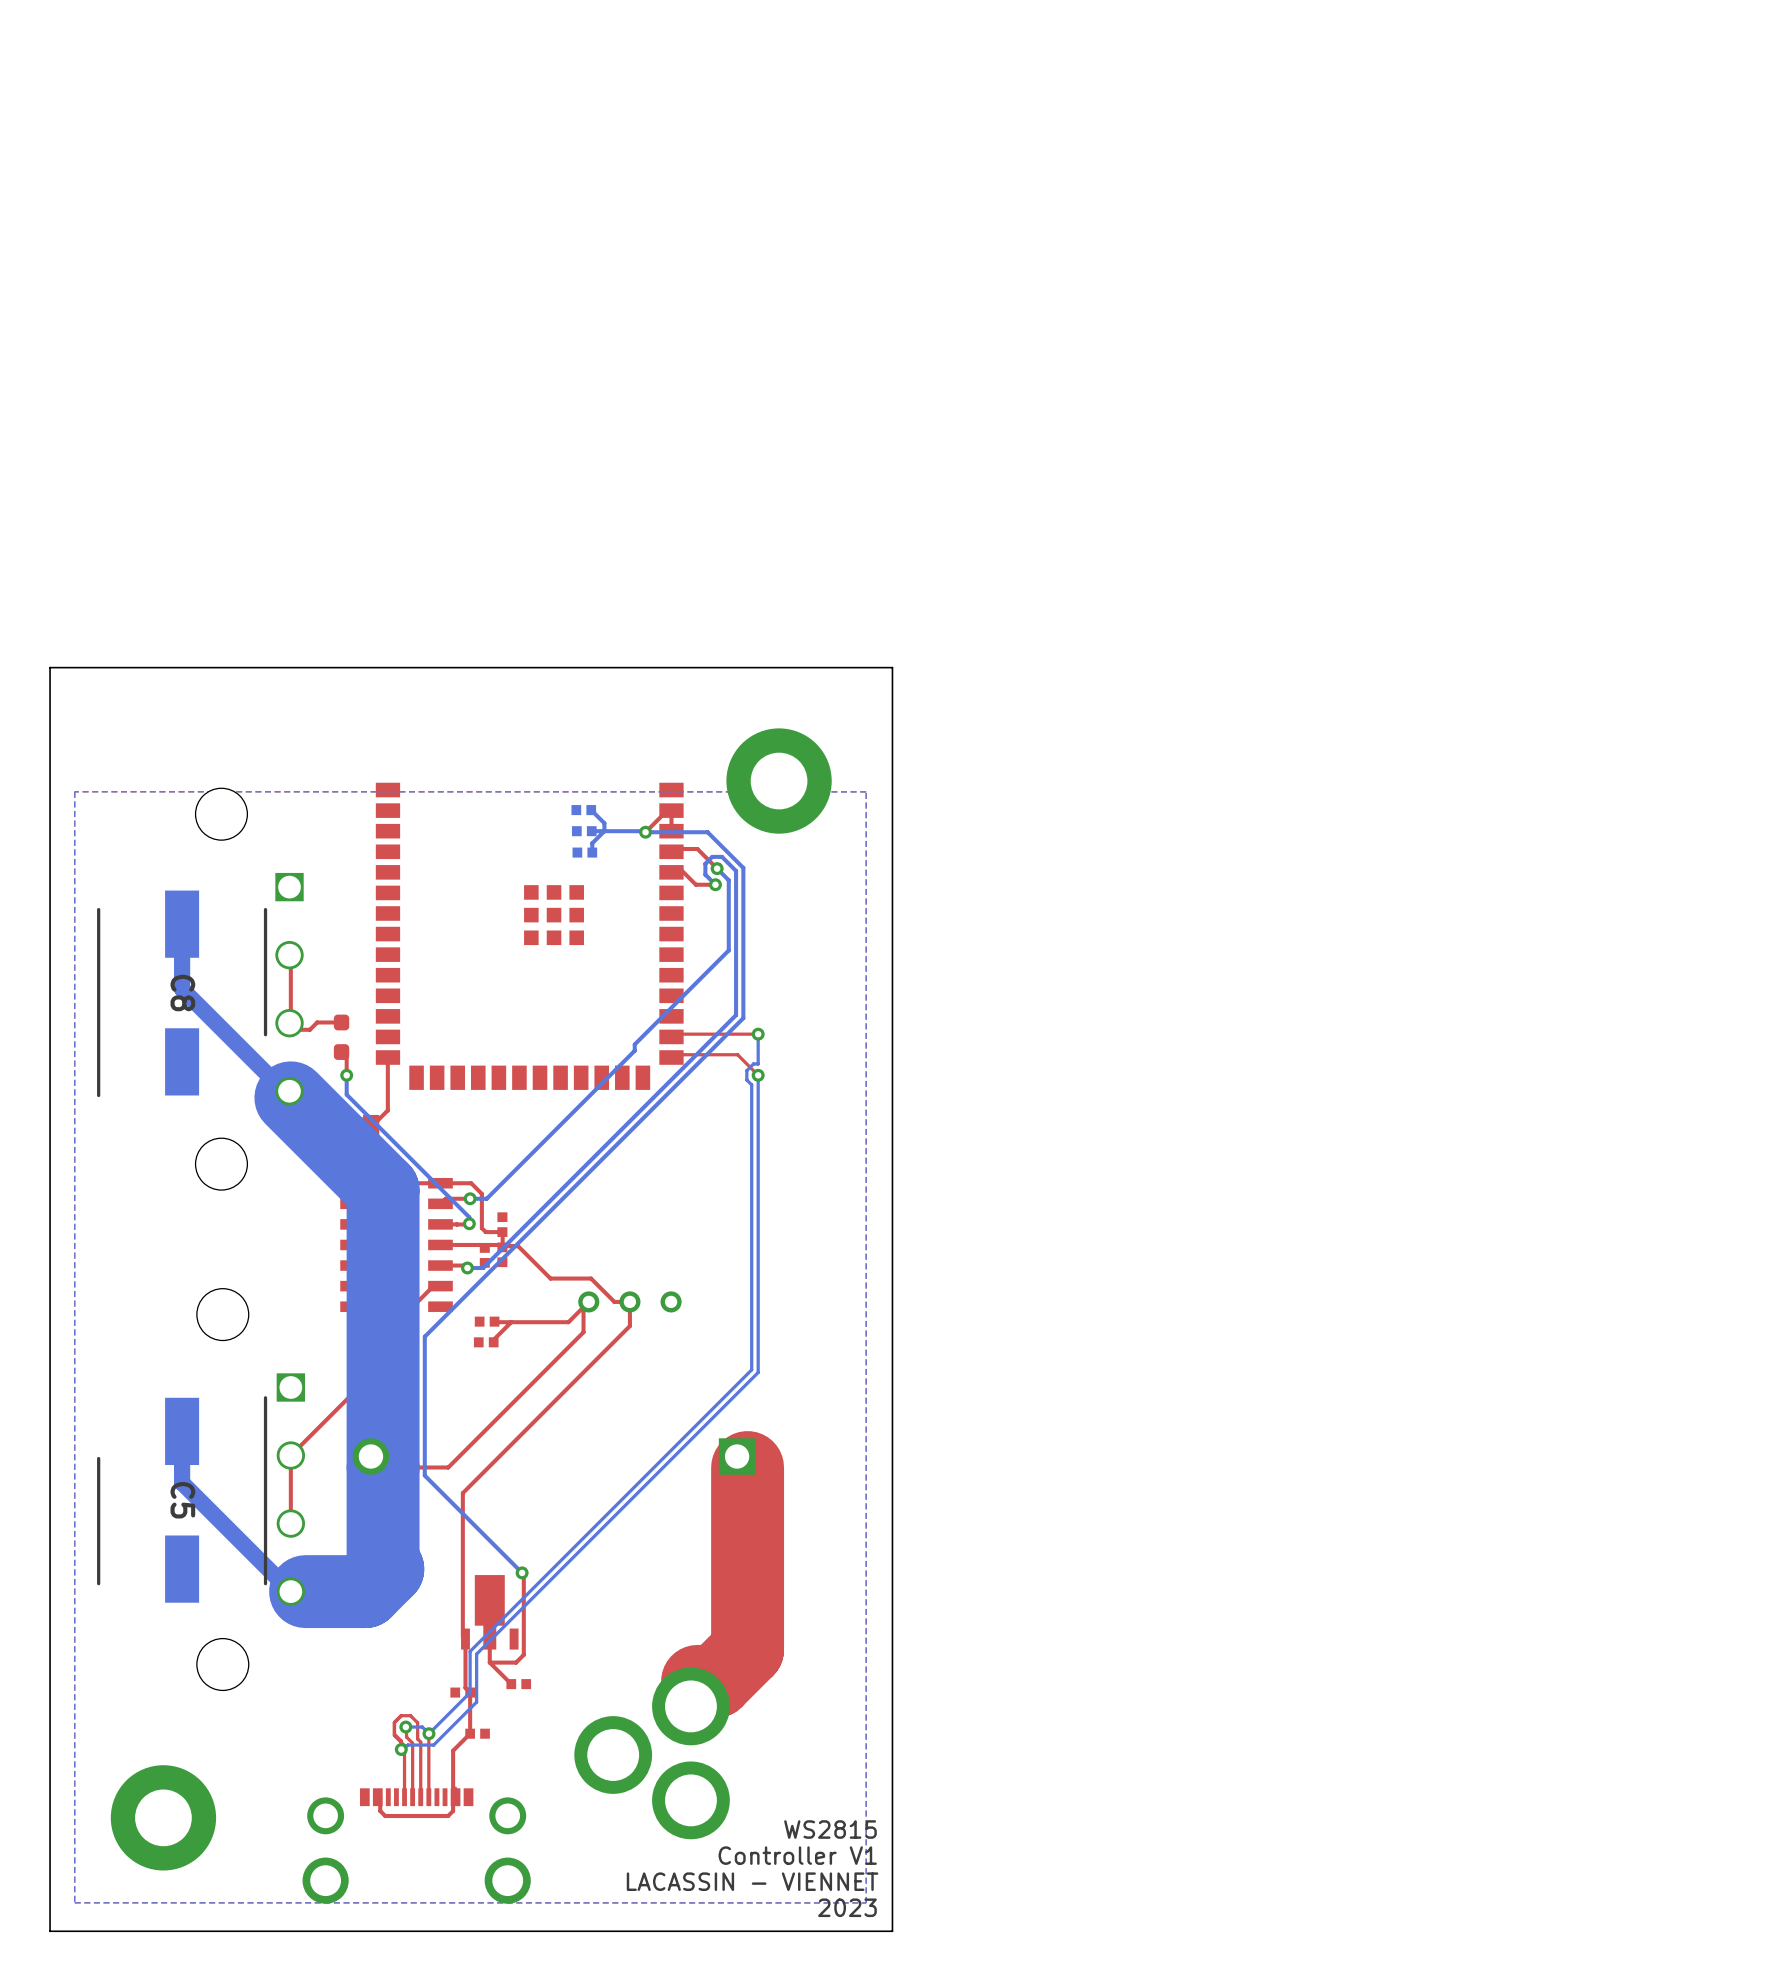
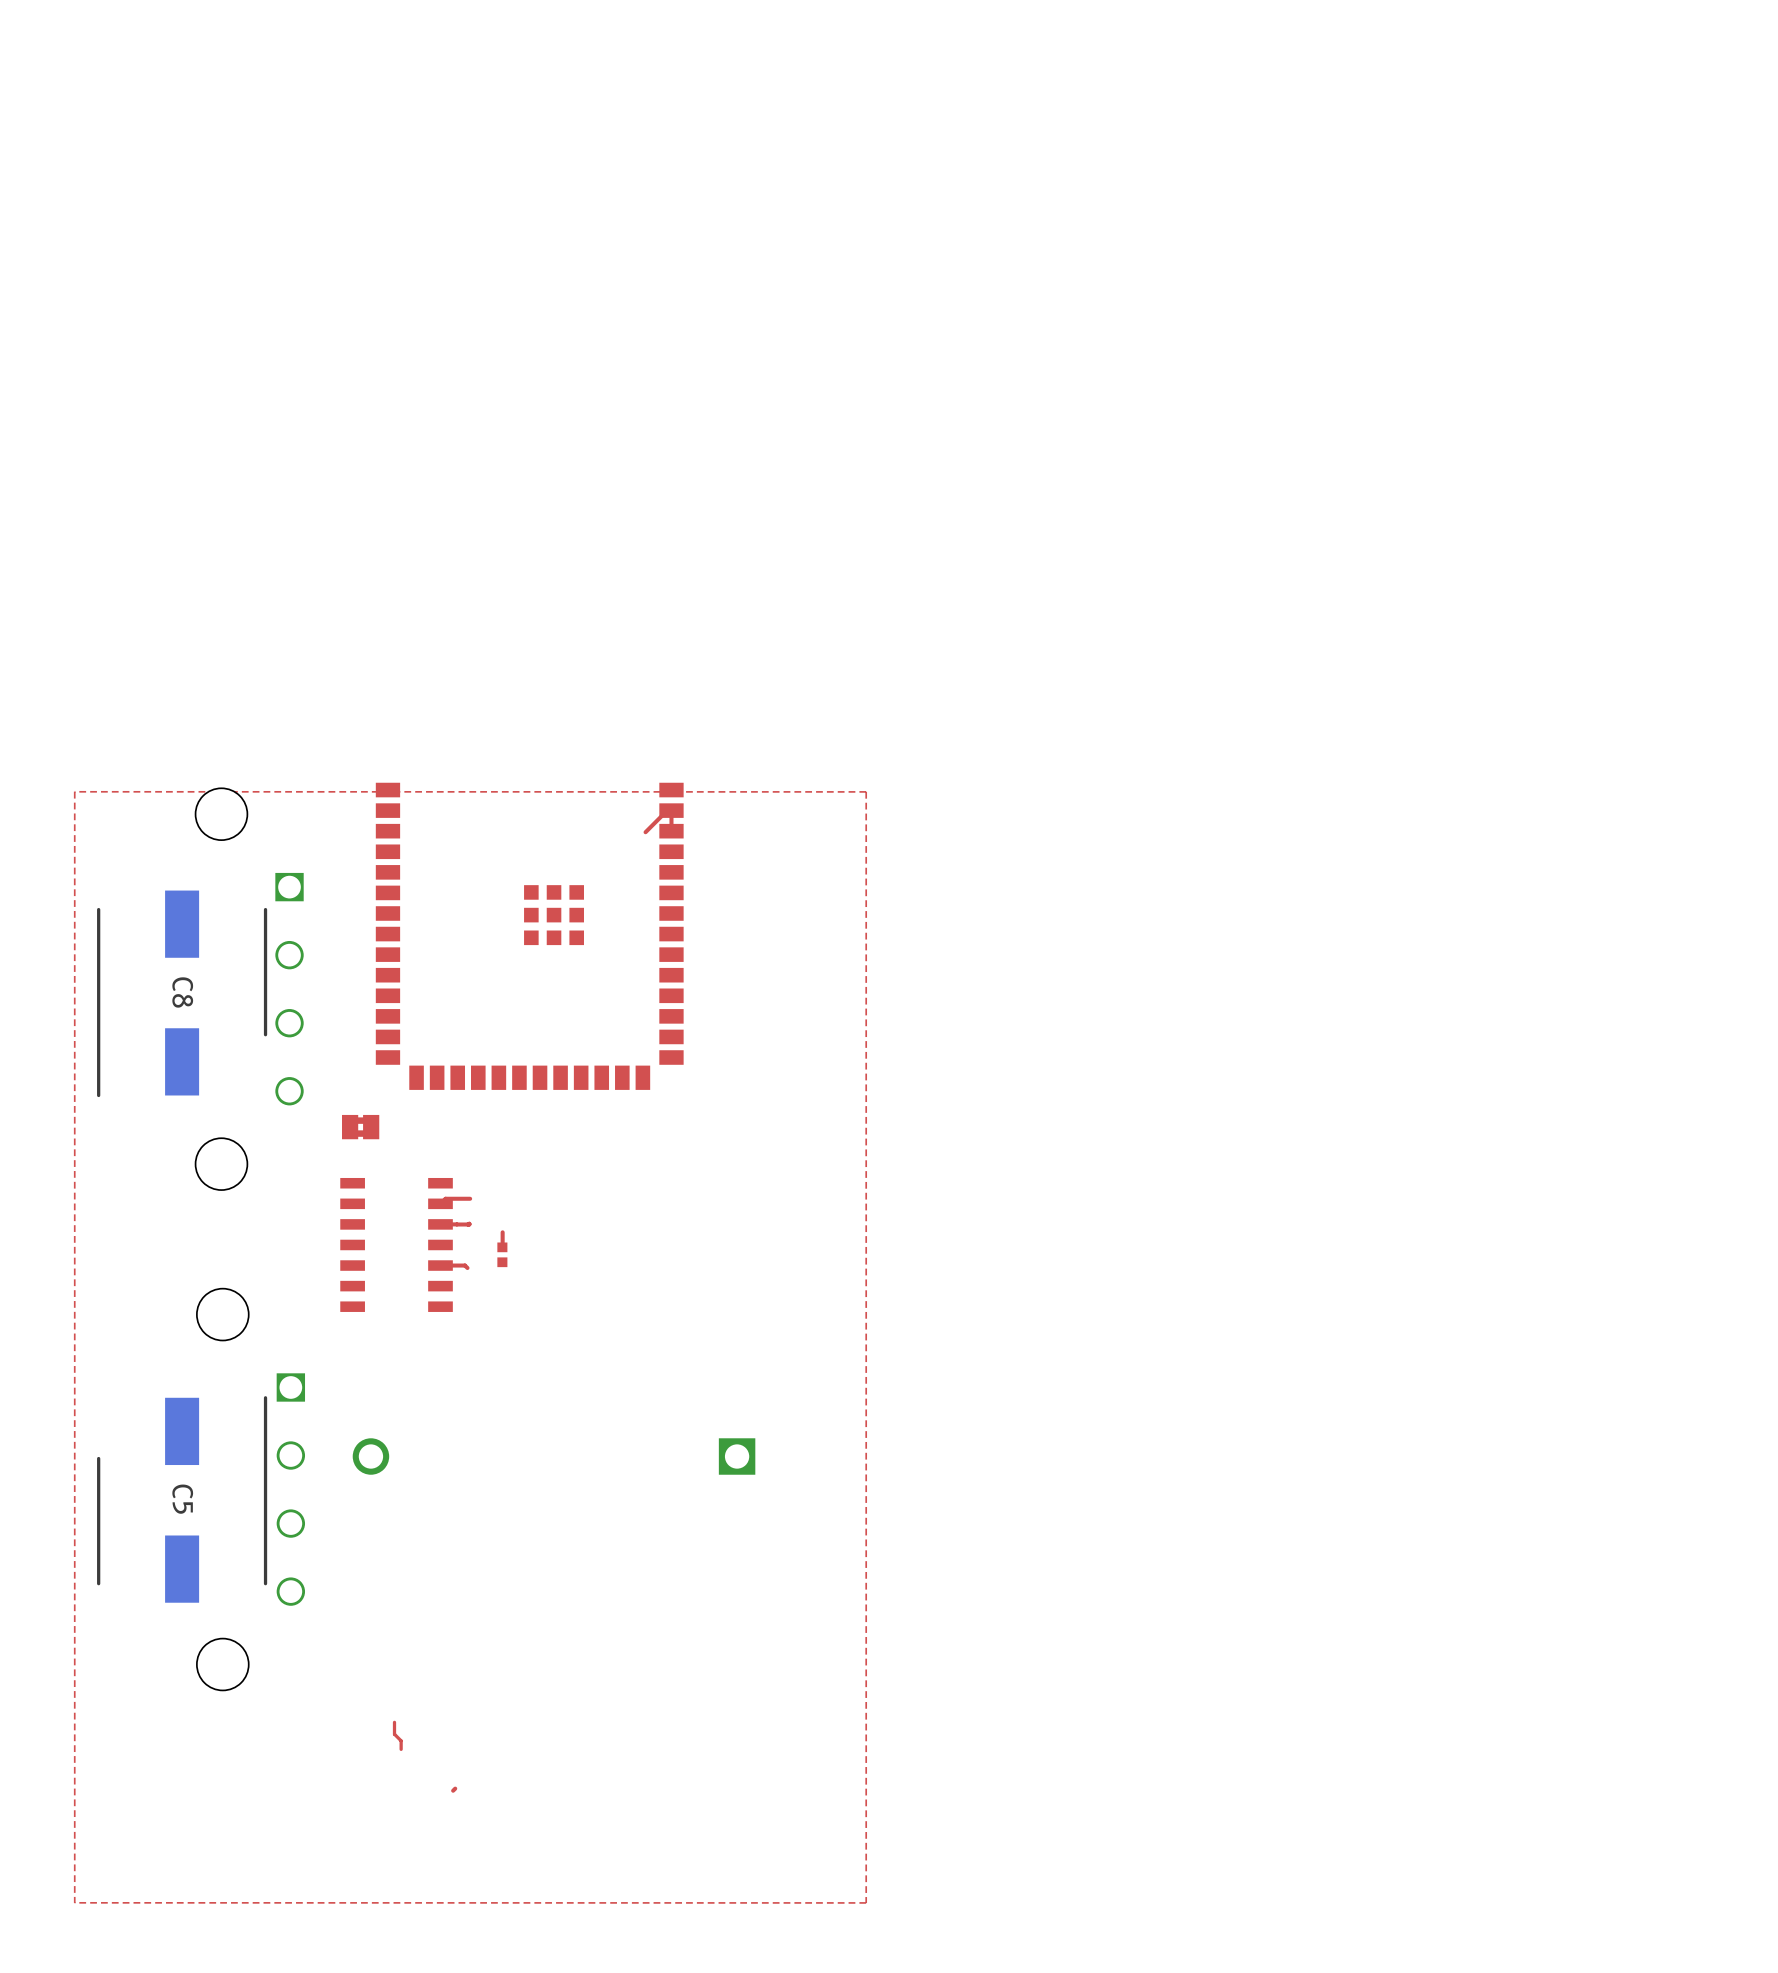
board edge: (892, 667) (50, 667) (50, 1931) (892, 1931) (892, 667) -> none
via: (779, 781) -> none
bottom zone outline: (74, 791) (866, 791) (866, 1902) (74, 1902) (74, 791) -> none
part: (583, 810) -> none
bottom track: (591, 810) (604, 823) (604, 831) (592, 843) (592, 852) -> none
part: (584, 831) -> none
bottom track: (591, 831) (707, 832) (743, 867) (743, 1018) (424, 1336) (424, 1475) (522, 1572) -> none
via: (645, 832) -> none
top track: (671, 848) (697, 848) (717, 868) -> none
part: (584, 852) -> none
bottom track: (717, 868) (728, 880) (728, 950) (634, 1044) (634, 1050) (486, 1198) (470, 1198) -> none
via: (717, 868) -> none
top track: (680, 869) (695, 884) (715, 884) -> none
bottom track: (715, 884) (705, 874) (705, 863) (712, 856) (722, 856) (736, 870) (736, 1015) (483, 1268) (467, 1268) -> none
via: (715, 884) -> none
bottom track: (182, 924) (182, 989) (383, 1190) (383, 1564) (387, 1569) (365, 1591) (305, 1591) -> none
top track: (290, 961) (290, 1029) (309, 1029) (317, 1022) (341, 1022) -> none
top track: (758, 1034) (671, 1034) -> none
bottom track: (758, 1034) (758, 1063) (753, 1063) (746, 1070) (746, 1080) (751, 1084) (751, 1369) (470, 1651) (470, 1692) (428, 1733) (422, 1727) (405, 1727) -> none
via: (758, 1034) -> none
part: (341, 1037) -> none
top track: (671, 1054) (737, 1054) (758, 1075) -> none
top track: (387, 1055) (387, 1110) (371, 1127) -> none
top track: (346, 1057) (346, 1075) -> none
bottom track: (346, 1075) (346, 1094) (469, 1217) (469, 1223) -> none
via: (346, 1075) -> none
bottom track: (758, 1075) (758, 1372) (476, 1654) (476, 1702) (433, 1745) (407, 1745) (401, 1749) -> none
via: (758, 1075) -> none
top track: (352, 1183) (471, 1183) (481, 1193) (481, 1228) (485, 1232) (502, 1232) -> none
via: (470, 1198) -> none
via: (469, 1223) -> none
part: (502, 1224) -> none
top track: (500, 1244) (440, 1244) -> none
top track: (500, 1246) (518, 1246) (550, 1278) (591, 1278) (614, 1301) (629, 1301) (629, 1326) (462, 1493) (462, 1636) (465, 1639) (465, 1687) (470, 1692) (470, 1733) (453, 1750) (453, 1810) (448, 1816) (385, 1816) (380, 1810) (380, 1797) -> none
part: (484, 1255) -> none
via: (467, 1268) -> none
top track: (433, 1286) (395, 1324) (395, 1341) -> none
part: (629, 1301) -> none
part: (487, 1321) -> none
top track: (495, 1322) (568, 1322) (583, 1307) (583, 1332) (448, 1467) (383, 1467) -> none
top track: (511, 1322) (493, 1339) -> none
top track: (365, 1341) (365, 1380) (290, 1455) (290, 1523) -> none
part: (486, 1342) -> none
bottom track: (182, 1431) (182, 1482) (290, 1591) -> none
top track: (747, 1467) (747, 1649) (715, 1681) (697, 1681) -> none
top track: (522, 1572) (523, 1574) (523, 1654) (516, 1662) (489, 1662) -> none
via: (522, 1572) -> none
part: (489, 1612) -> none
top track: (489, 1637) (489, 1662) -> none
top track: (489, 1662) (511, 1684) -> none
part: (518, 1684) -> none
part: (462, 1692) -> none
top track: (405, 1726) (406, 1737) (412, 1743) (412, 1797) -> none
via: (405, 1727) -> none
top track: (428, 1733) (428, 1797) -> none
via: (428, 1733) -> none
part: (477, 1733) -> none
via: (401, 1749) -> none
part: (652, 1753) -> none
top track: (420, 1797) (420, 1742) (417, 1739) (417, 1722) (410, 1715) (401, 1715) (394, 1722) (394, 1735) (405, 1746) (404, 1797) -> none
via: (163, 1817) -> none
text: WS2815 (830, 1829) -> none
part: (416, 1846) -> none
text: Controller V1 (797, 1855) -> none
text: LACASSIN - VIENNET (752, 1881) -> none
text: 2023 (847, 1907) -> none

